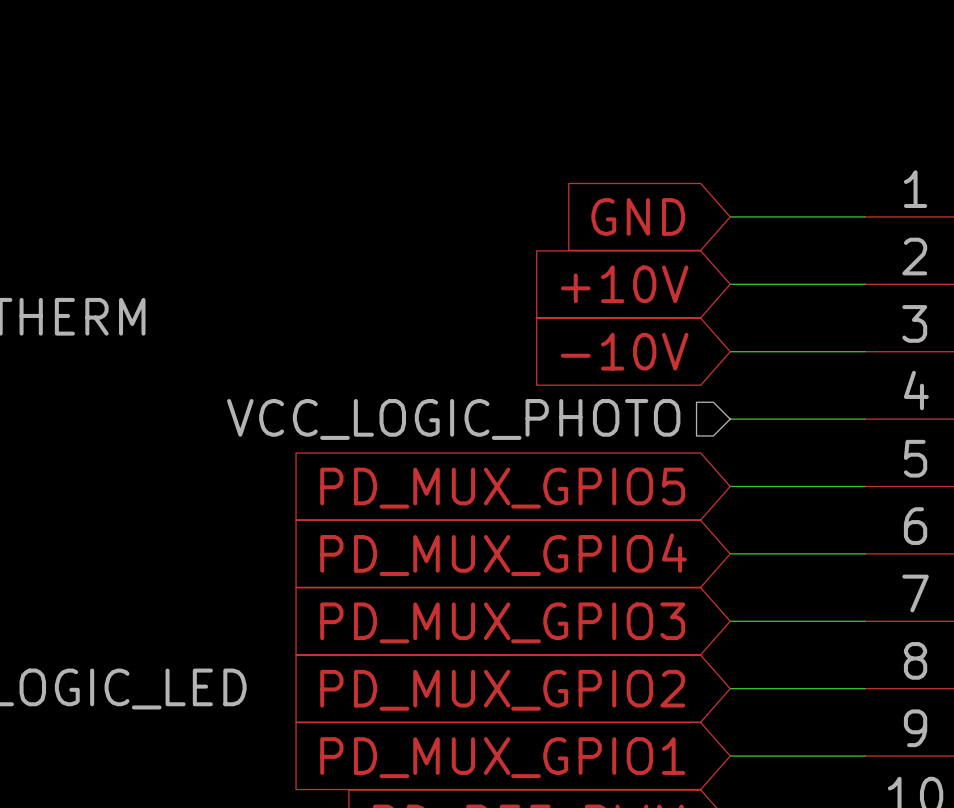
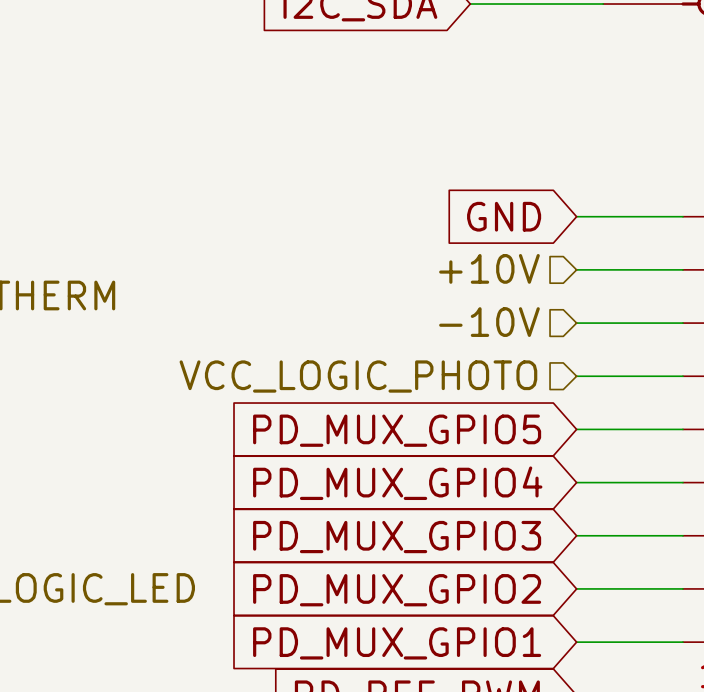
hierarchical label: none -> +10V (489, 268)
global label: +10V (624, 284) -> none
hierarchical label: none -> -10V (489, 322)
global label: -10V (624, 351) -> none

